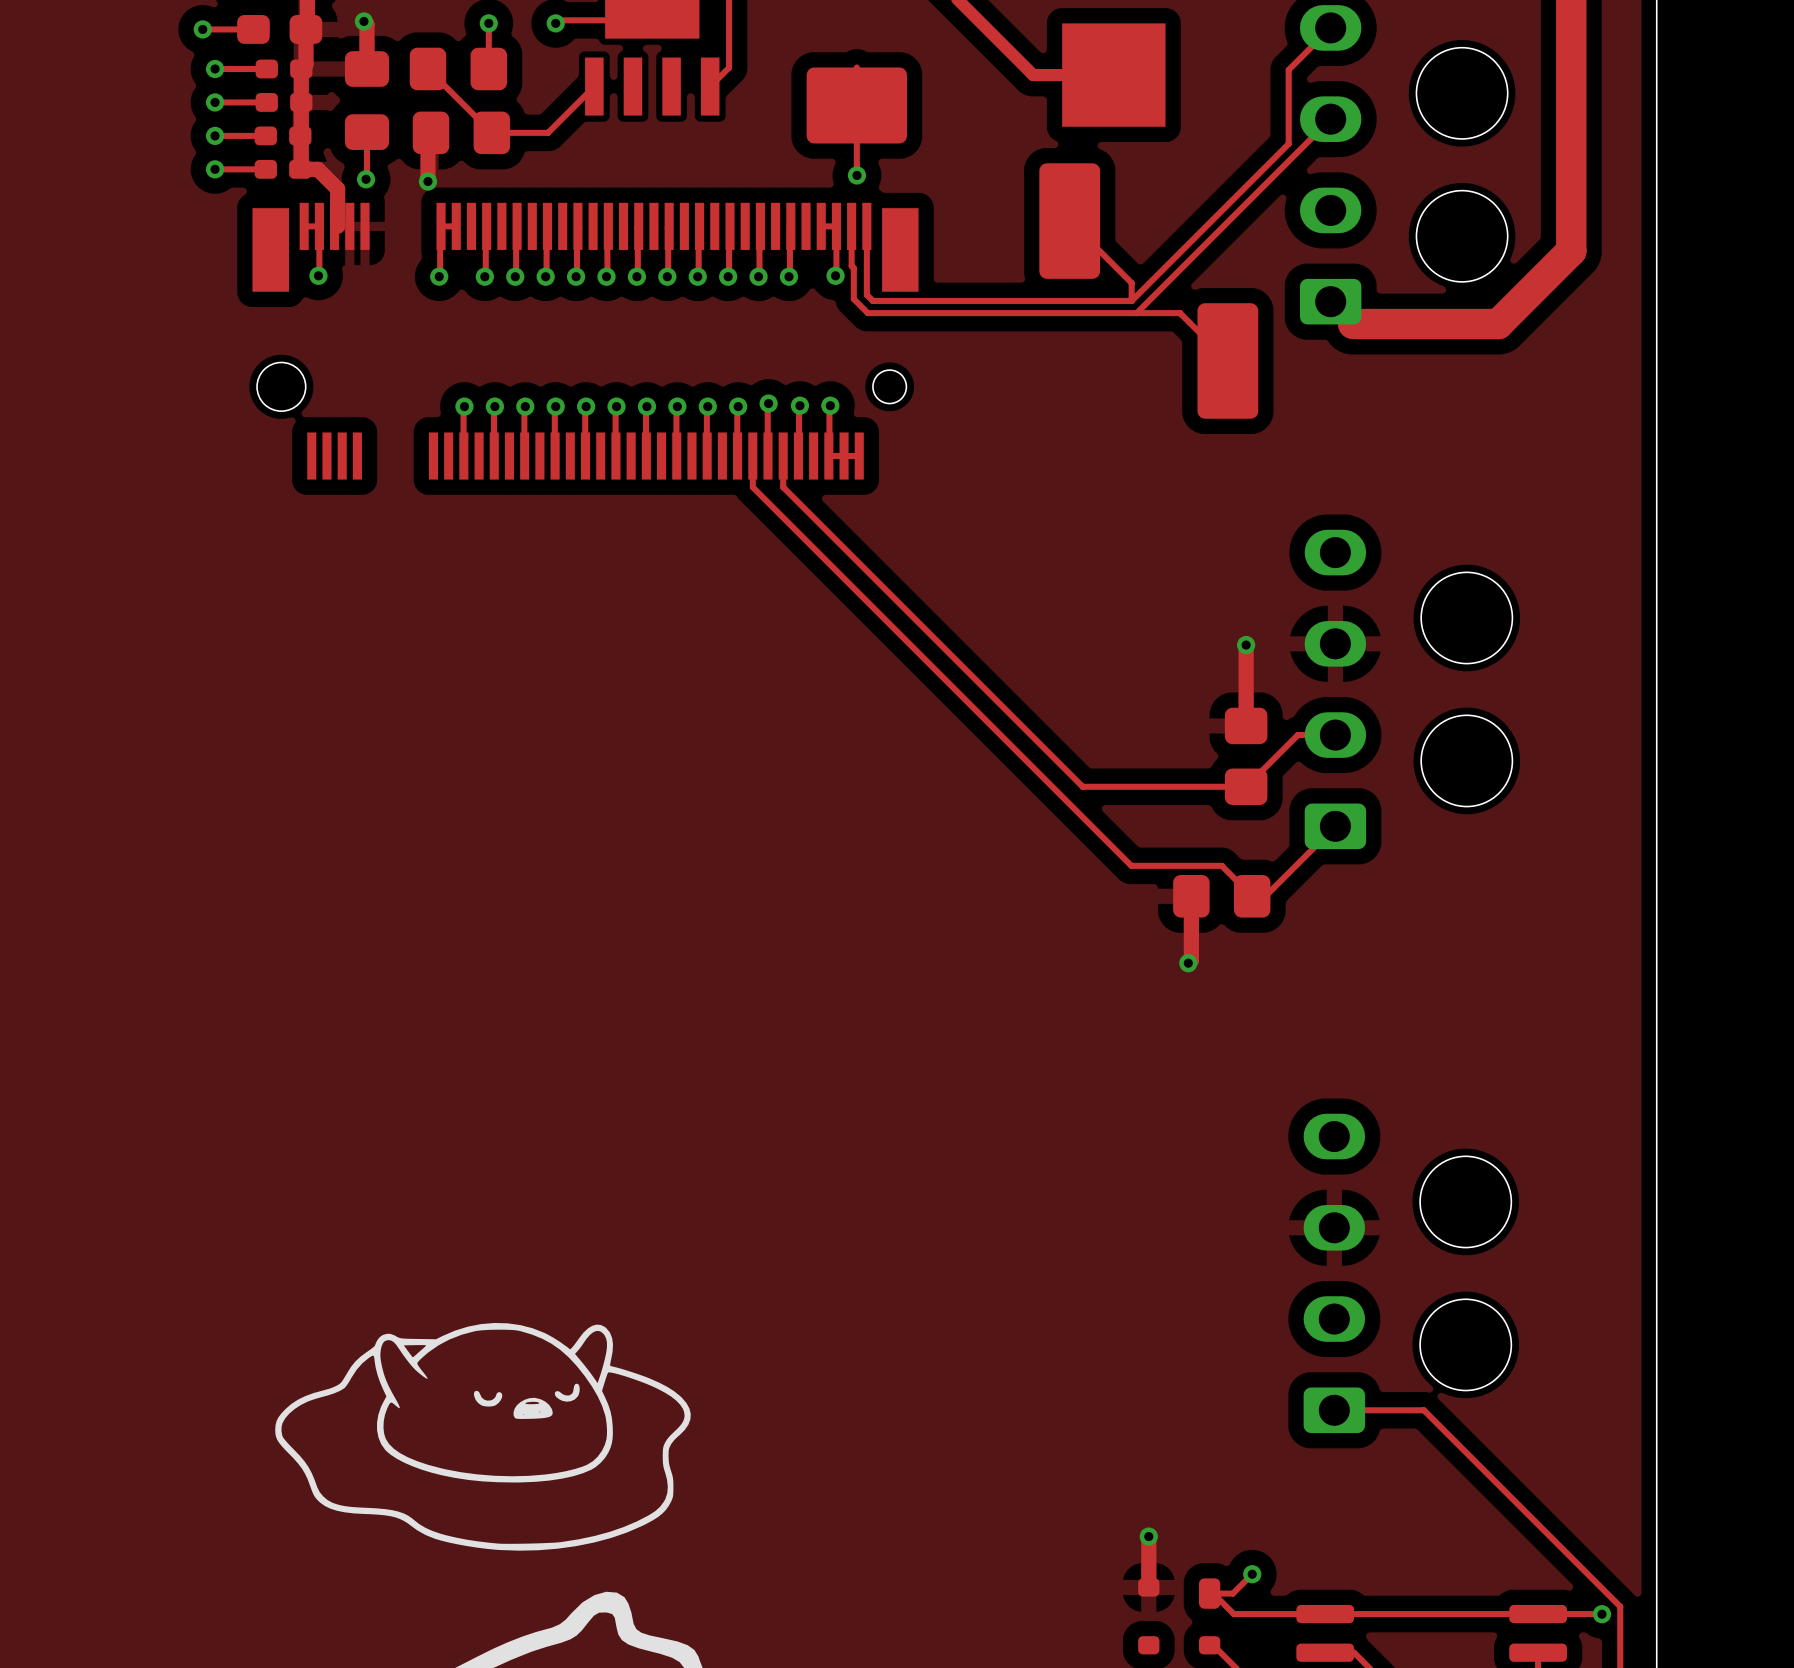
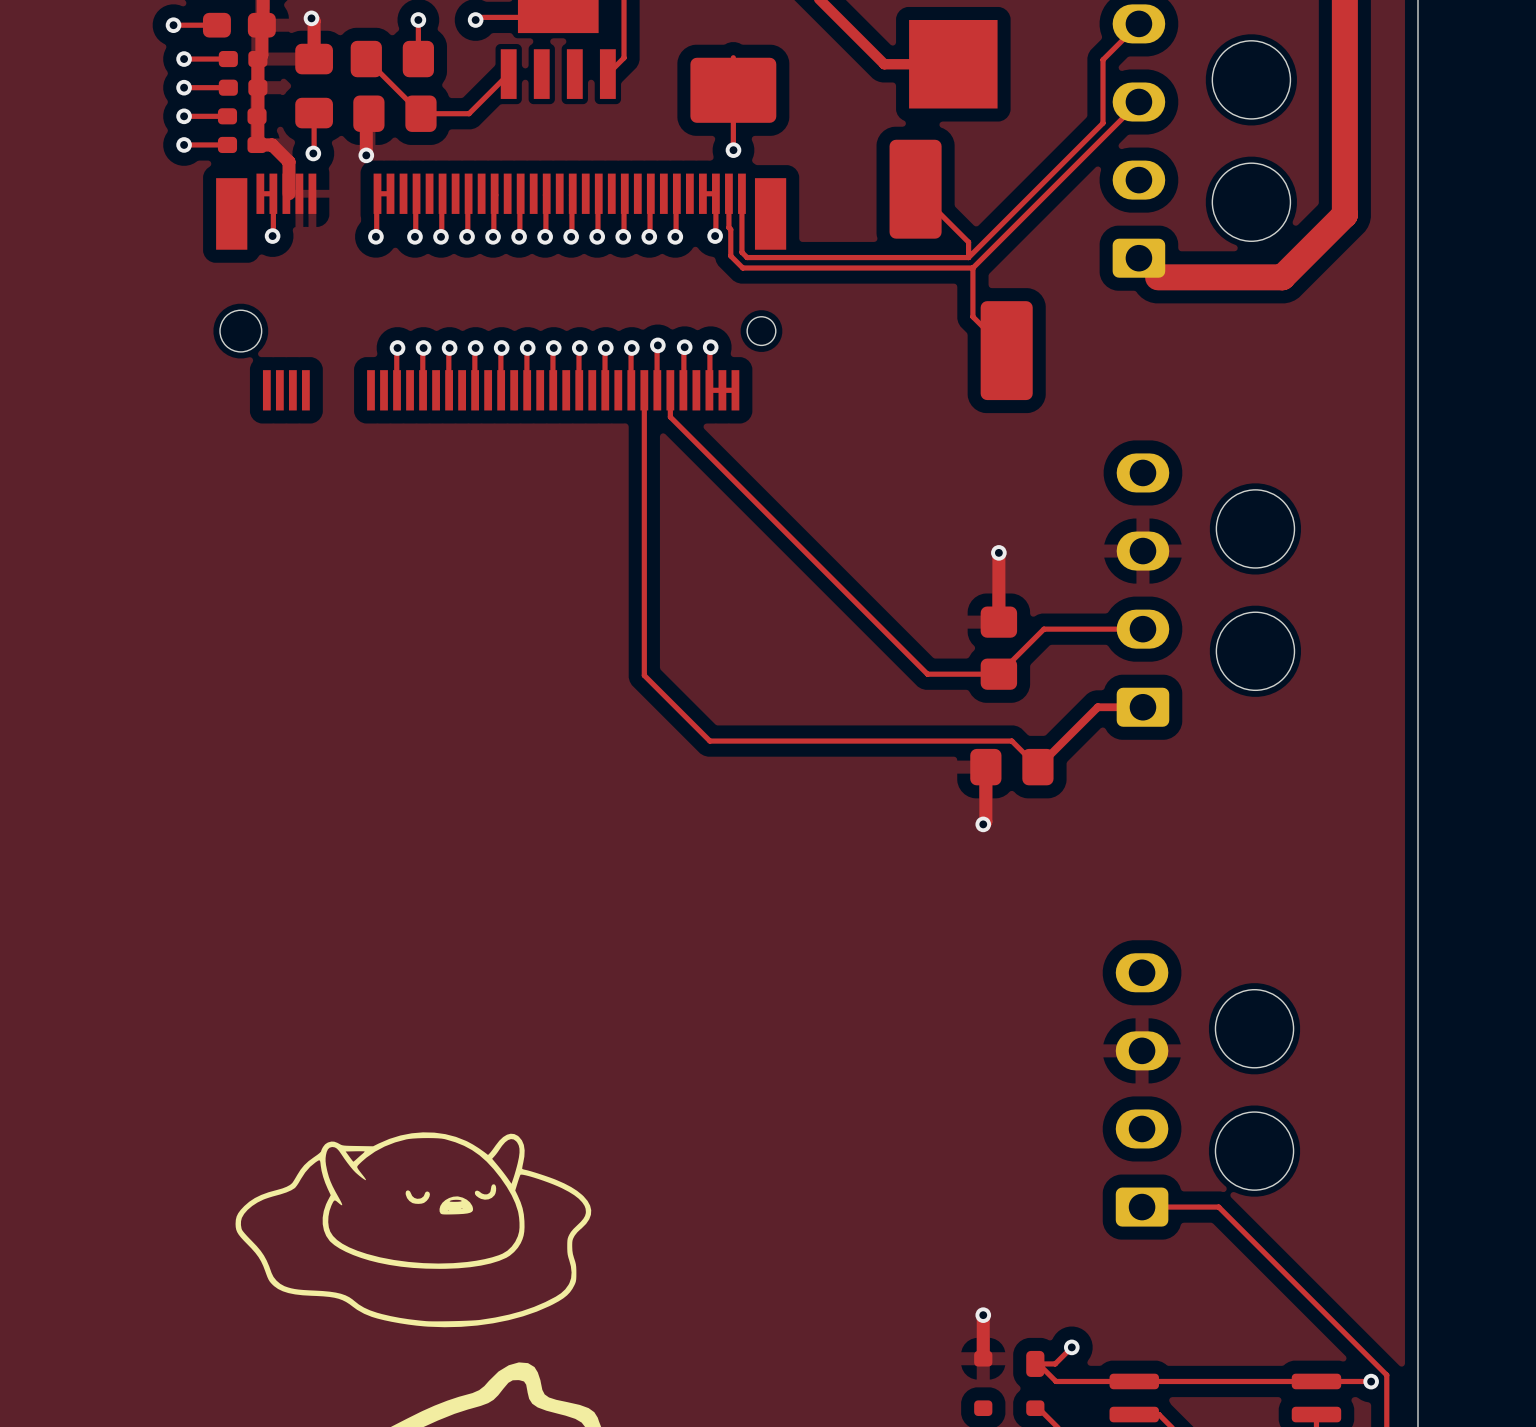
top track: (1136, 313) (1180, 313) (1227, 360) -> (972, 268) (972, 316) (1006, 350)
part position: (1227, 360) -> (1006, 350)
top track: (752, 487) (1131, 865) -> (644, 417) (644, 675) (709, 741) (968, 741)
top track: (1246, 645) (1246, 725) -> (998, 552) (998, 622)
via position: (1246, 645) -> (998, 552)
top track: (1297, 735) (1246, 786) (1082, 786) -> (1110, 629) (1043, 629) (998, 674) (926, 673)
part: (1246, 756) -> none
part: none -> (998, 648)
top track: (1335, 826) (1265, 896) (1252, 896) (1221, 865) (1182, 865) -> (1142, 707) (1097, 707) (1037, 767) (1011, 741)
top track: (1191, 896) (1191, 960) (1188, 963) -> (985, 767) (985, 821) (983, 824)
part position: (1221, 896) -> (1011, 767)
via position: (1188, 963) -> (983, 824)

